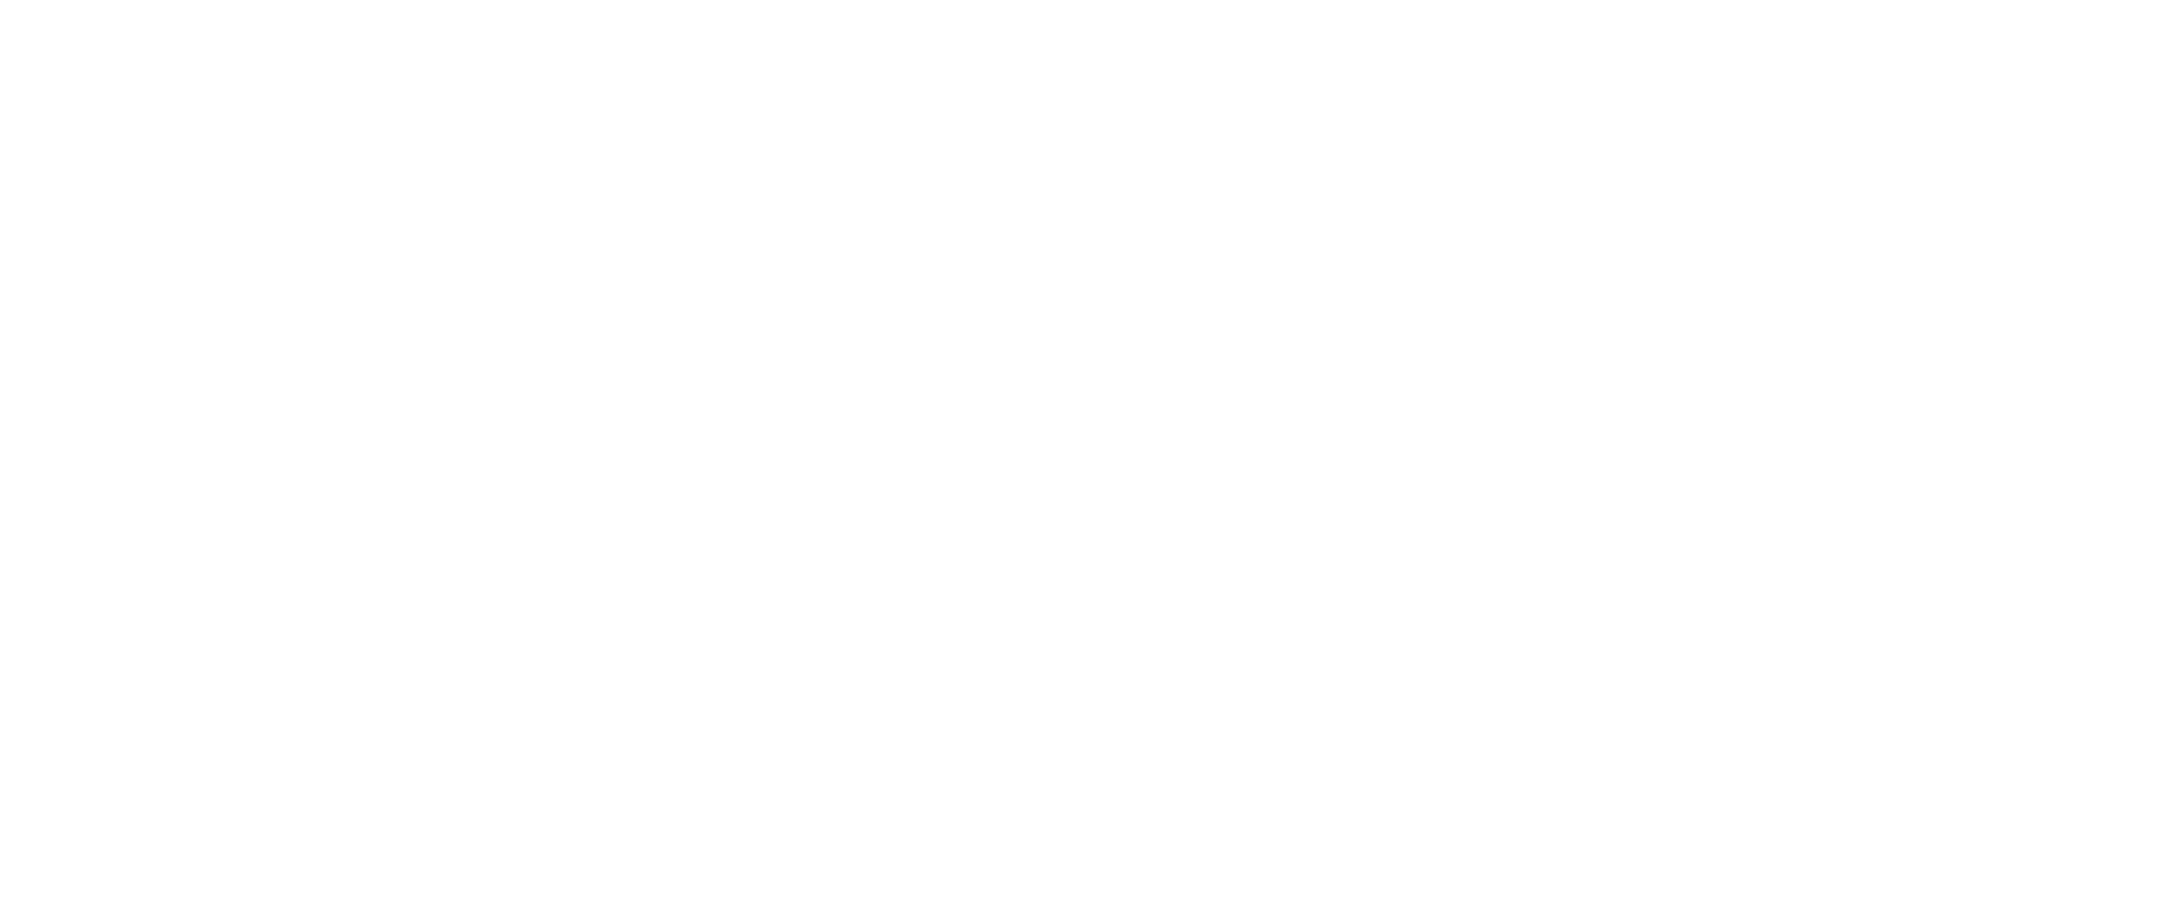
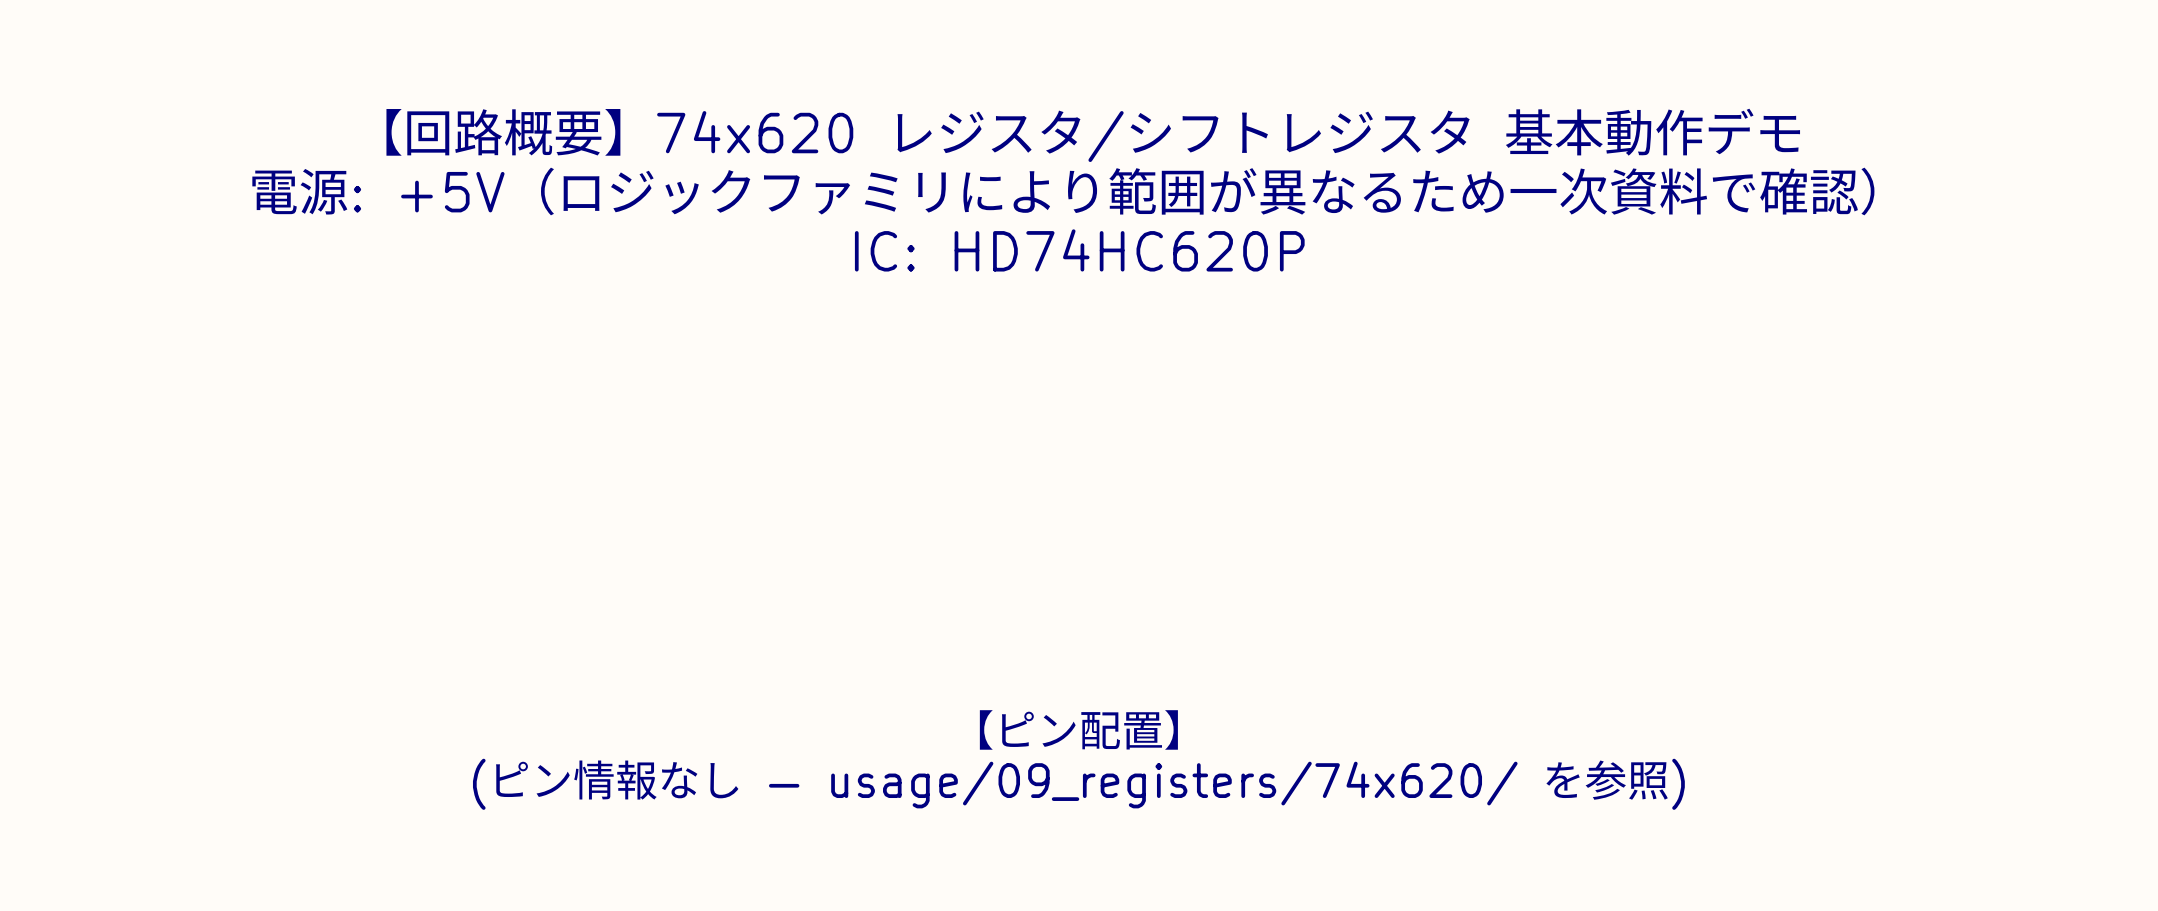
text: none -> 【回路概要】74x620 レジスタ/シフトレジスタ 基本動作デモ (1093, 134)
text: none -> 電源: +5V（ロジックファミリにより範囲が異なるため一次資料で確認） (1063, 191)
text: none -> IC: HD74HC620P (1079, 250)
text: none -> 【ピン配置】 (1078, 729)
text: none -> (ピン情報なし — usage/09_registers/74x620/ を参照) (1078, 784)

